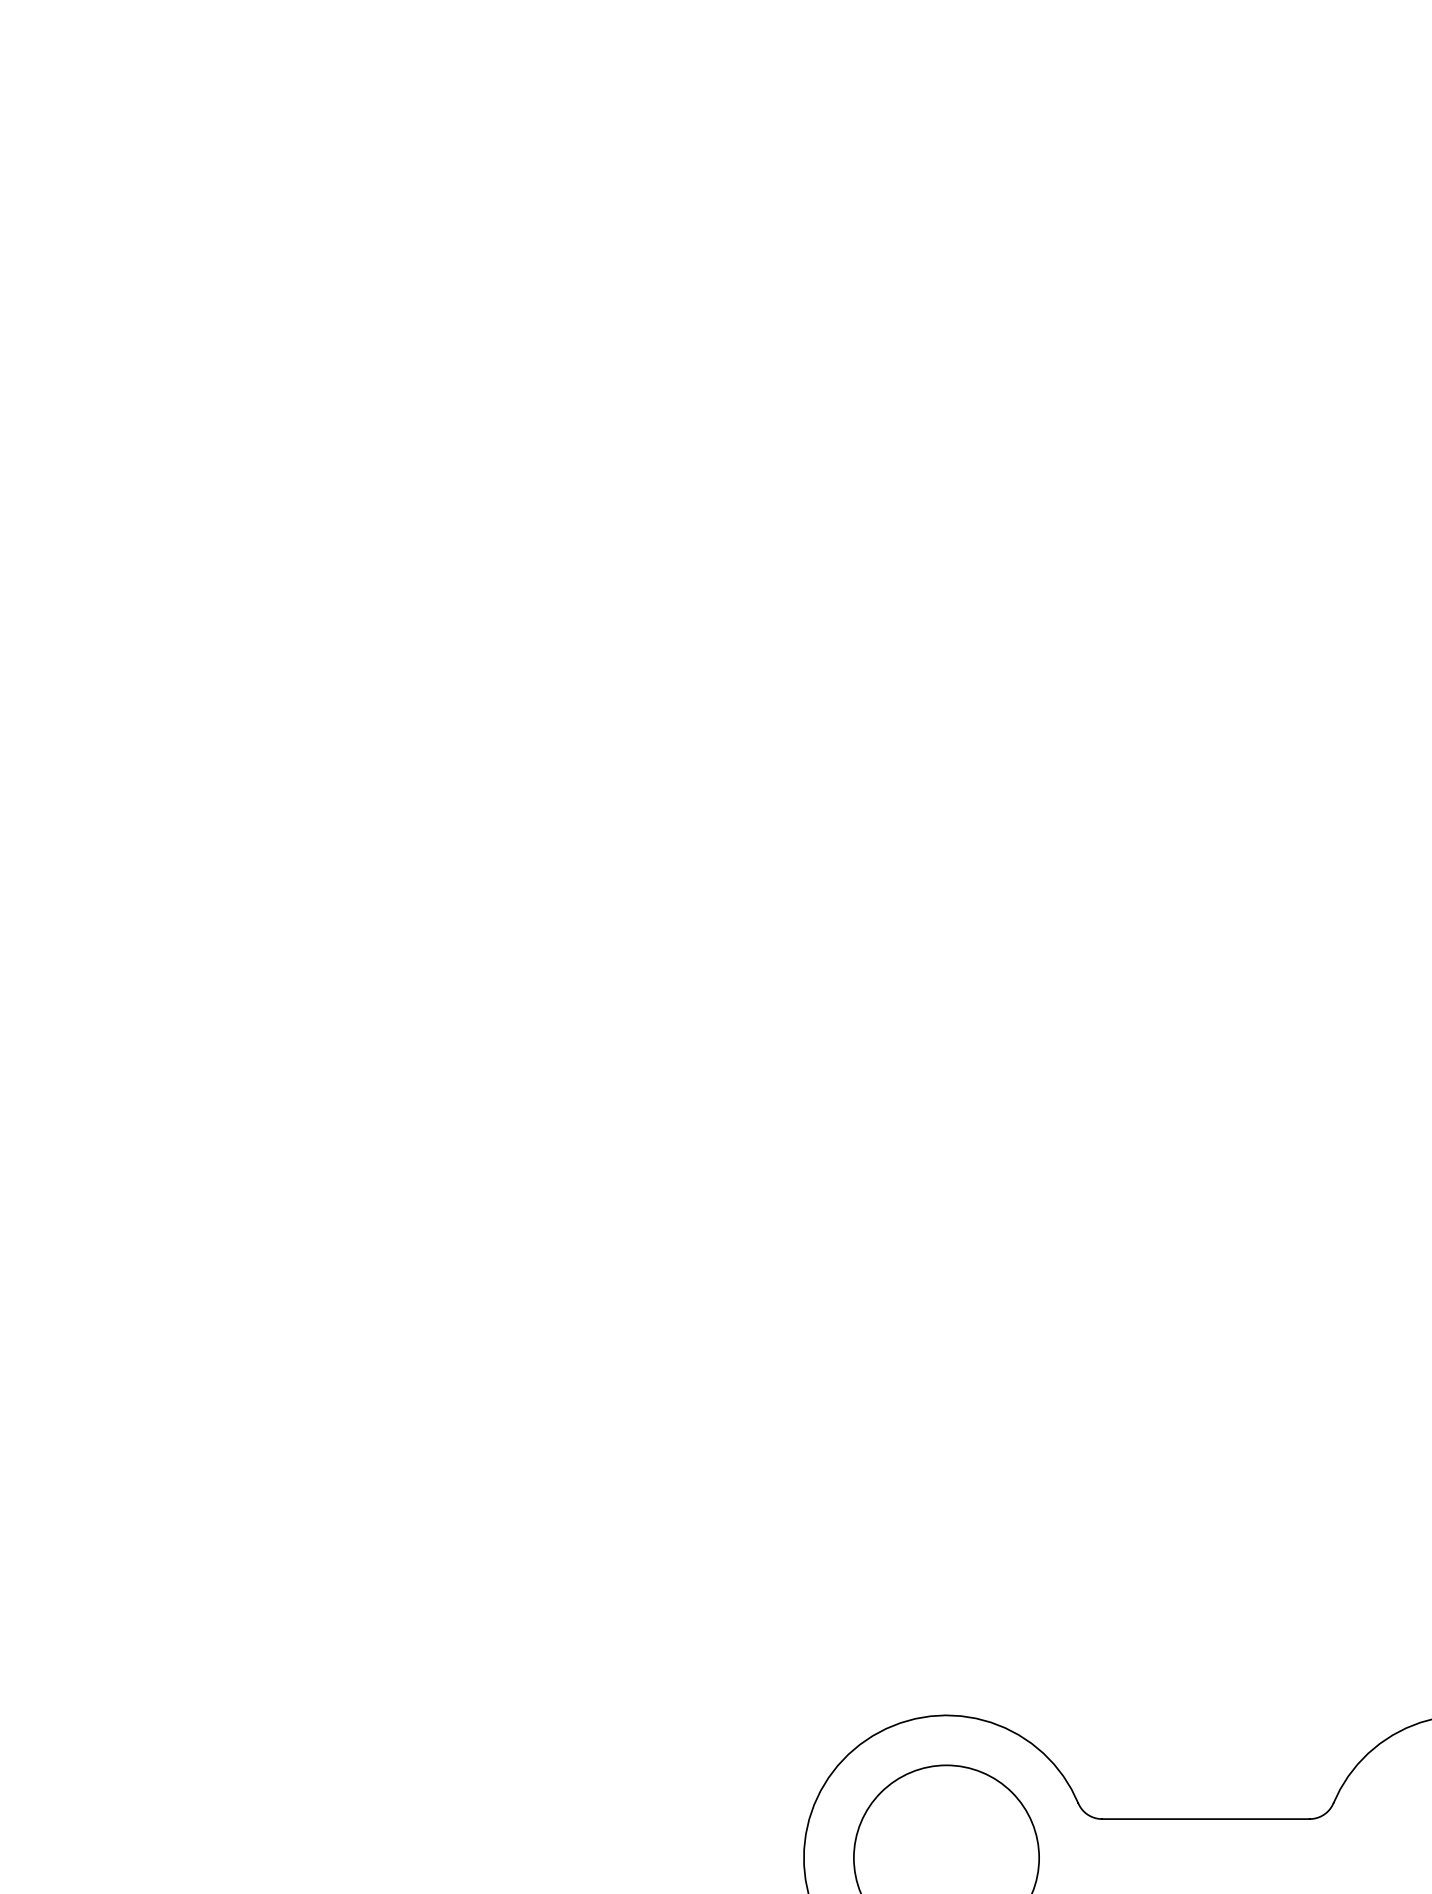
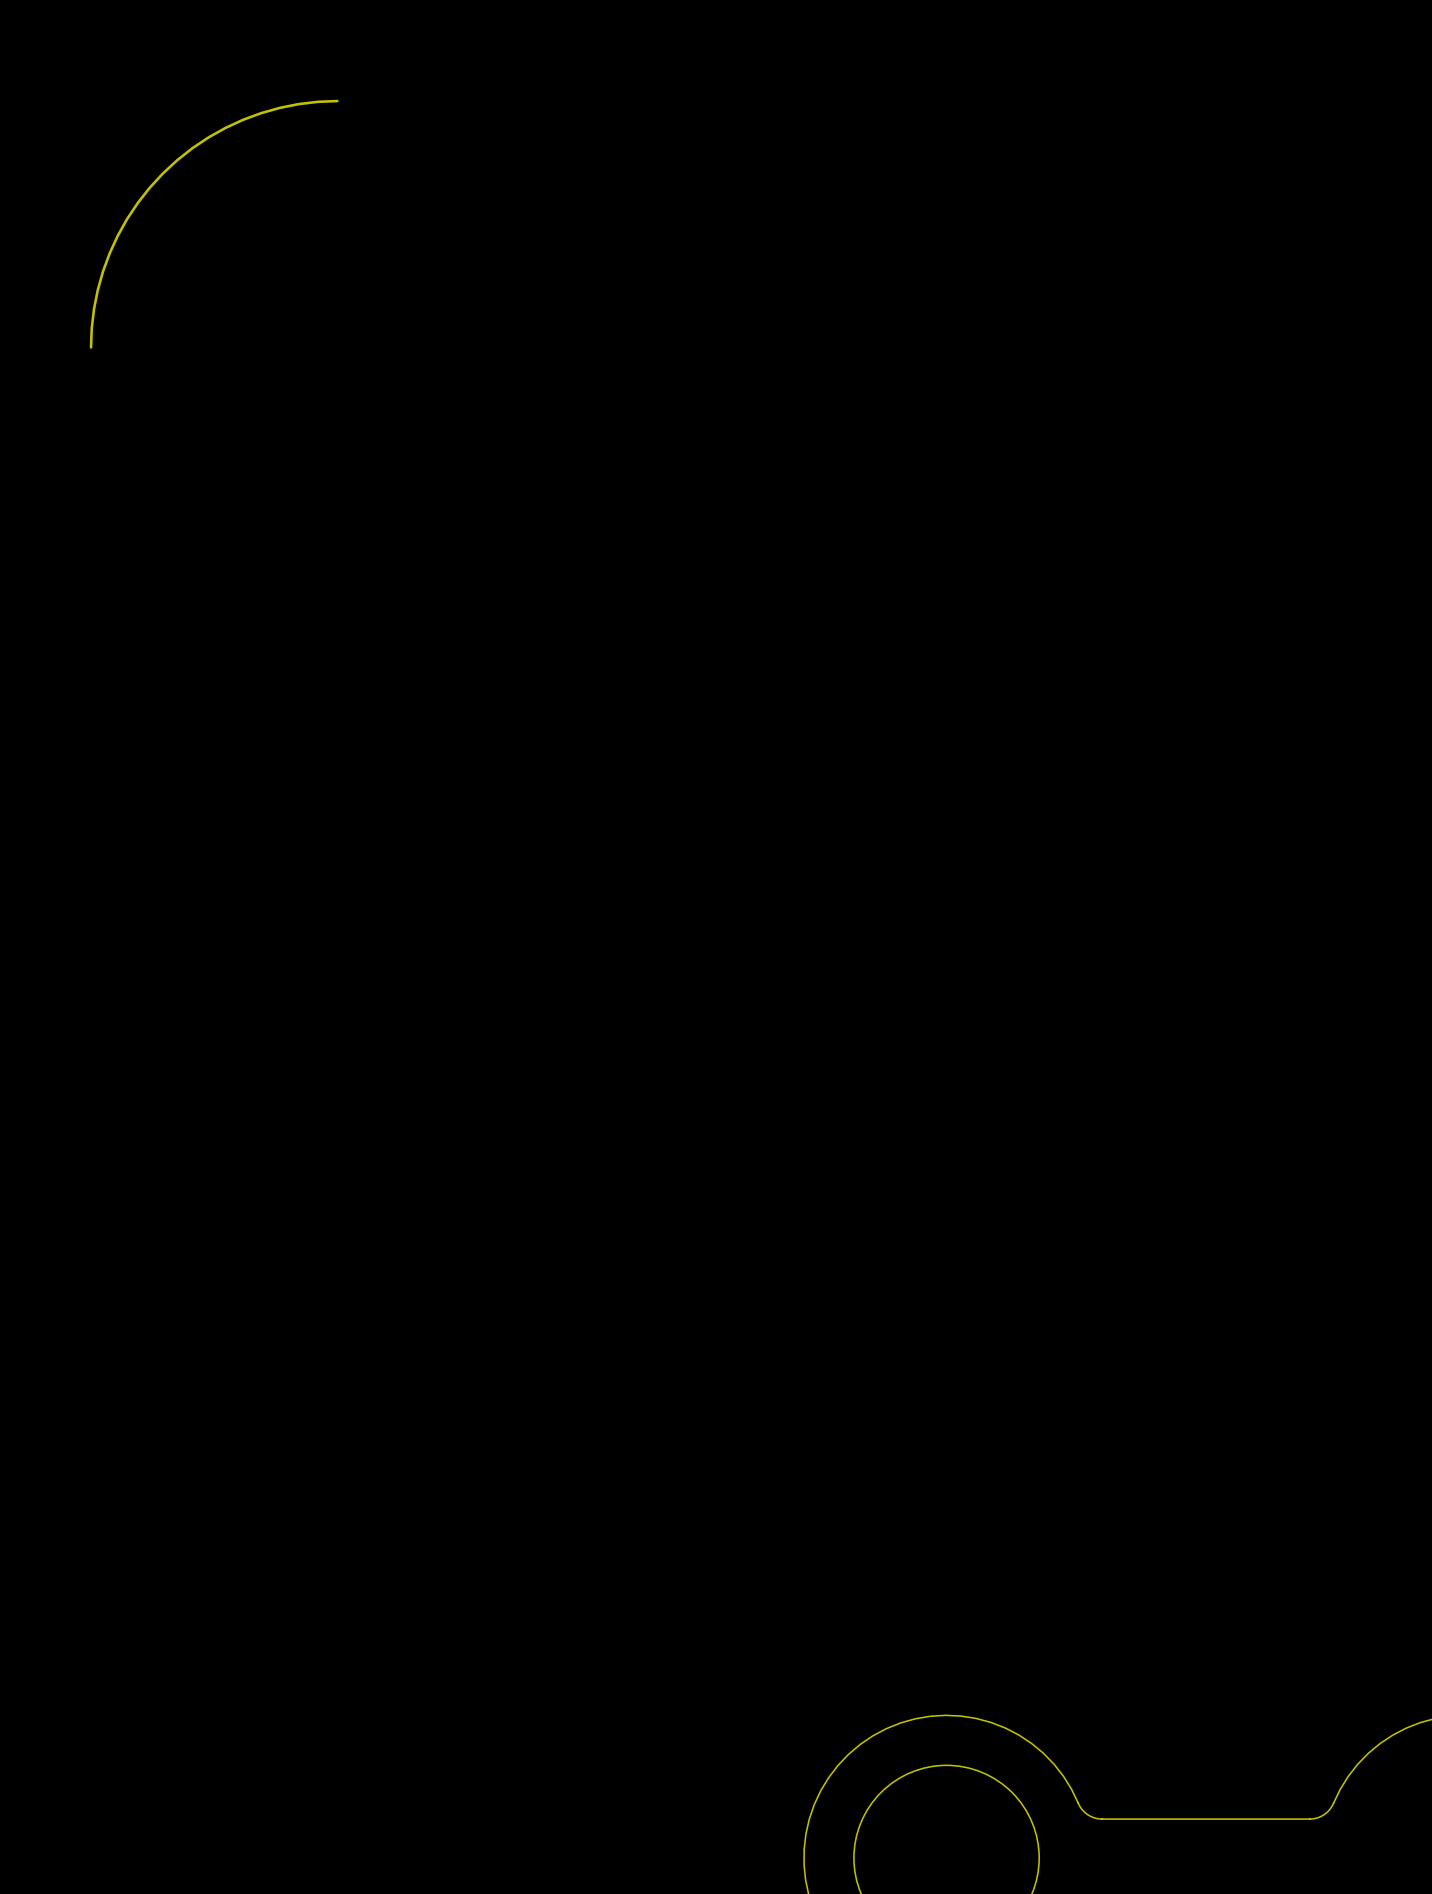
board edge: none -> (337, 101) (318, 101) (279, 107) (243, 119) (208, 137) (177, 160) (163, 173) (150, 187) (127, 218) (109, 253) (97, 289) (94, 308) (91, 347)

